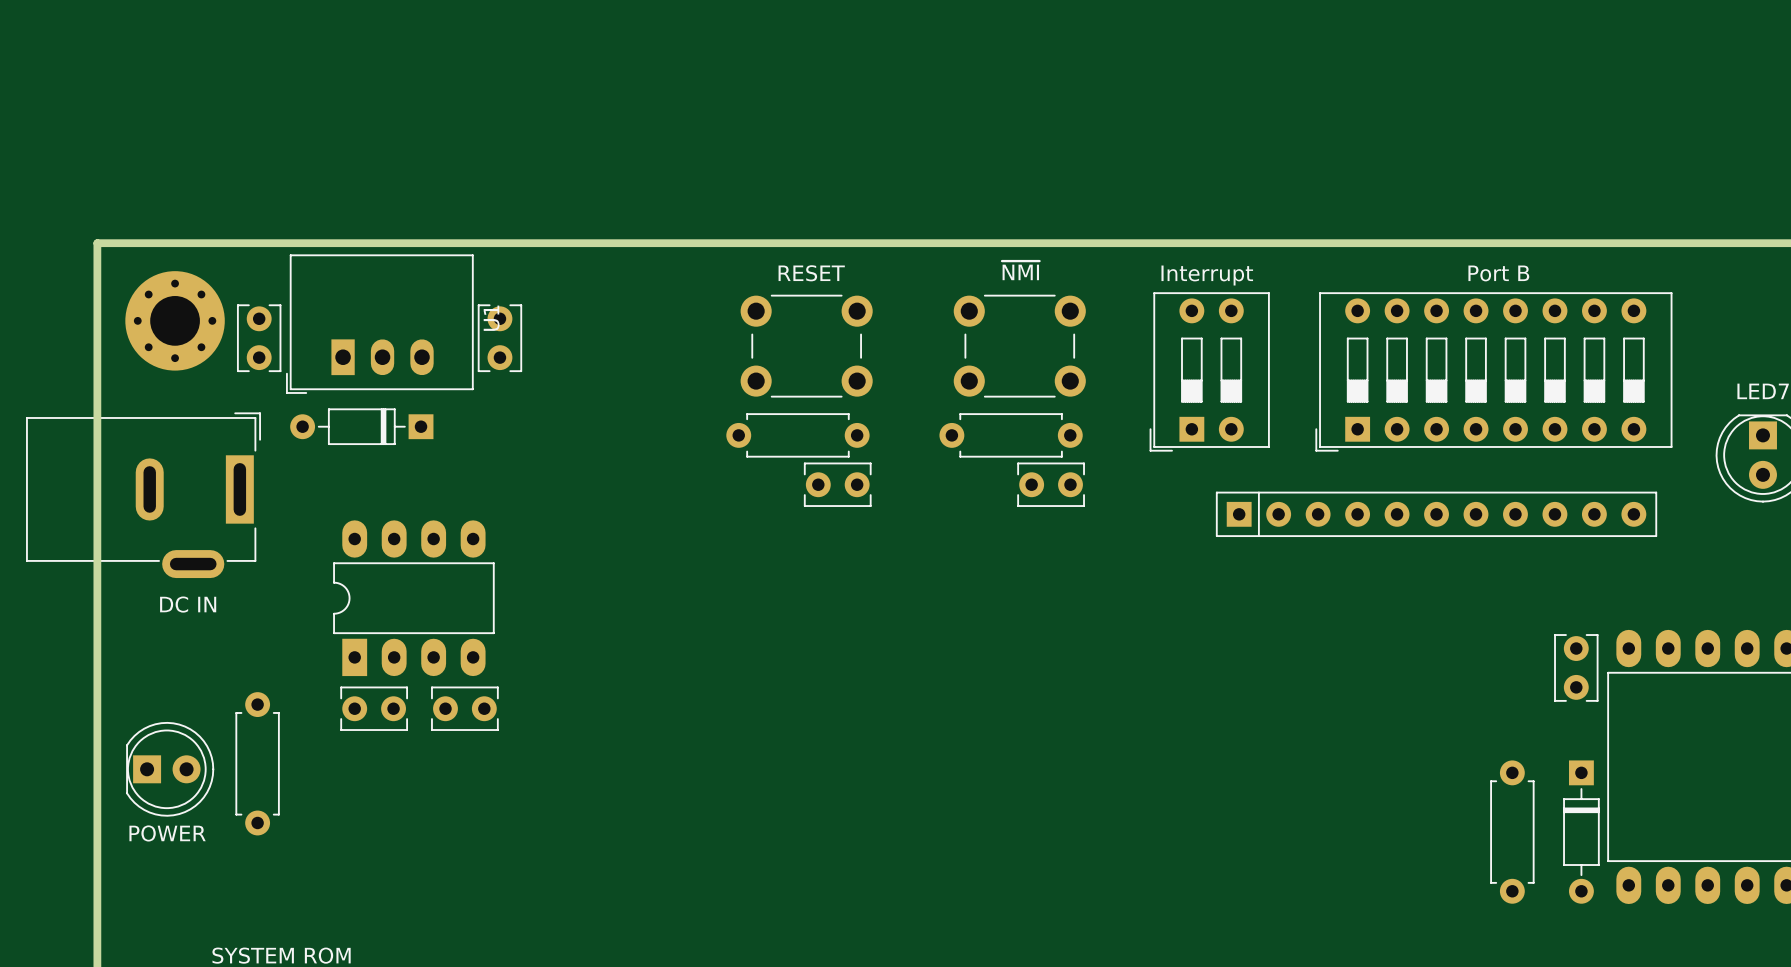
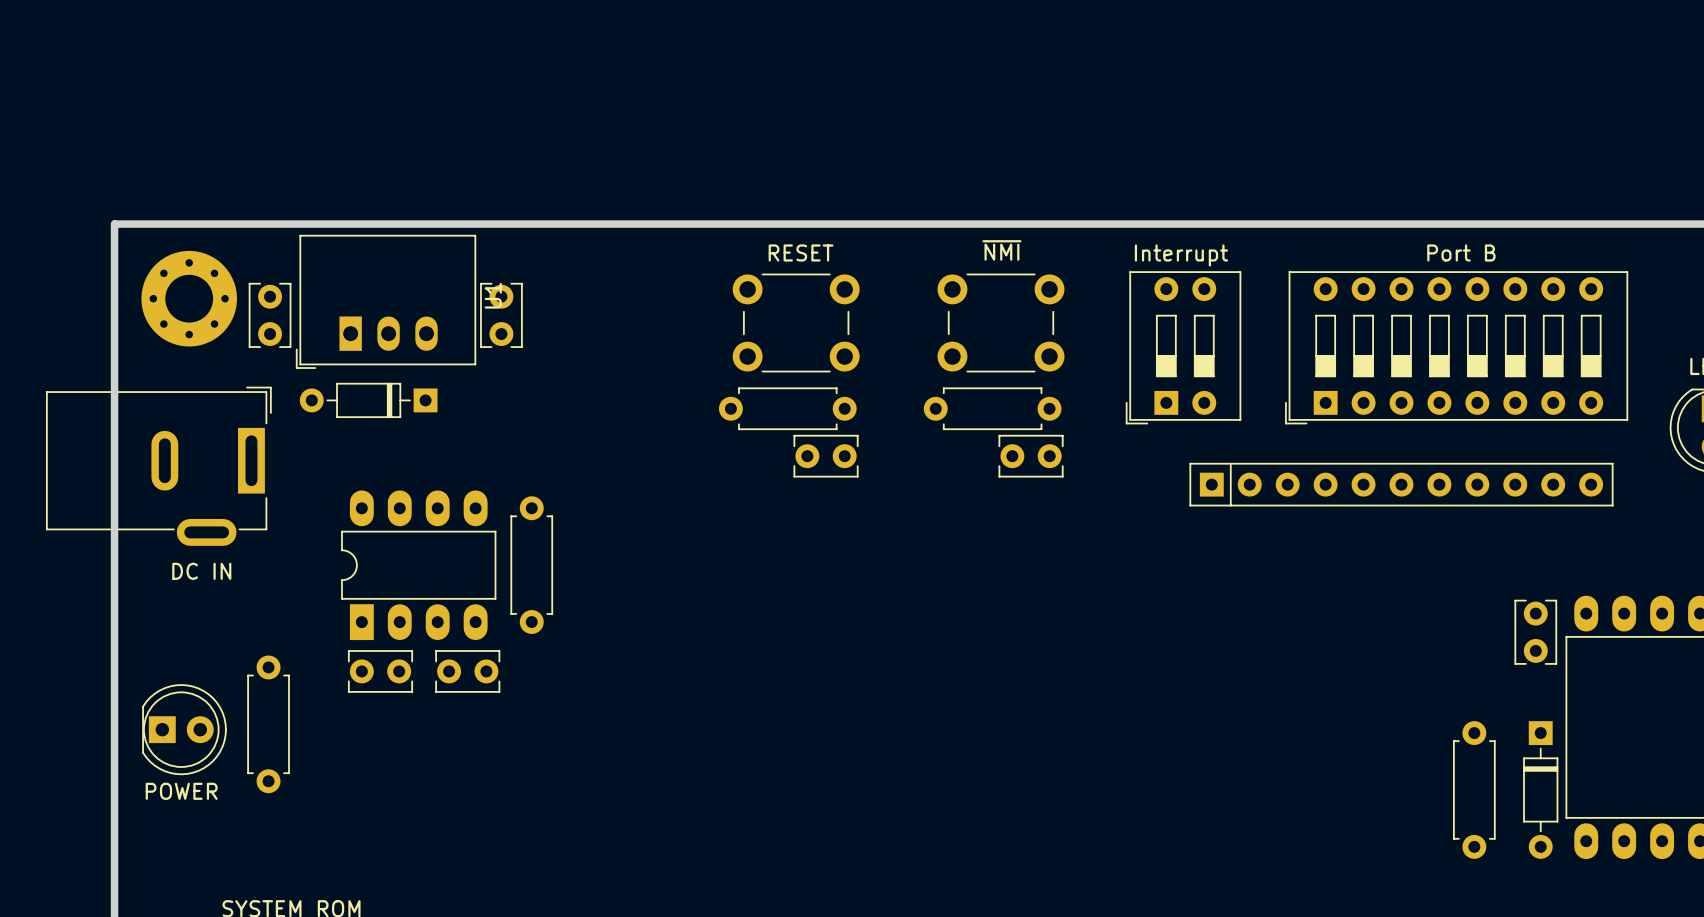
part: none -> (531, 565)

